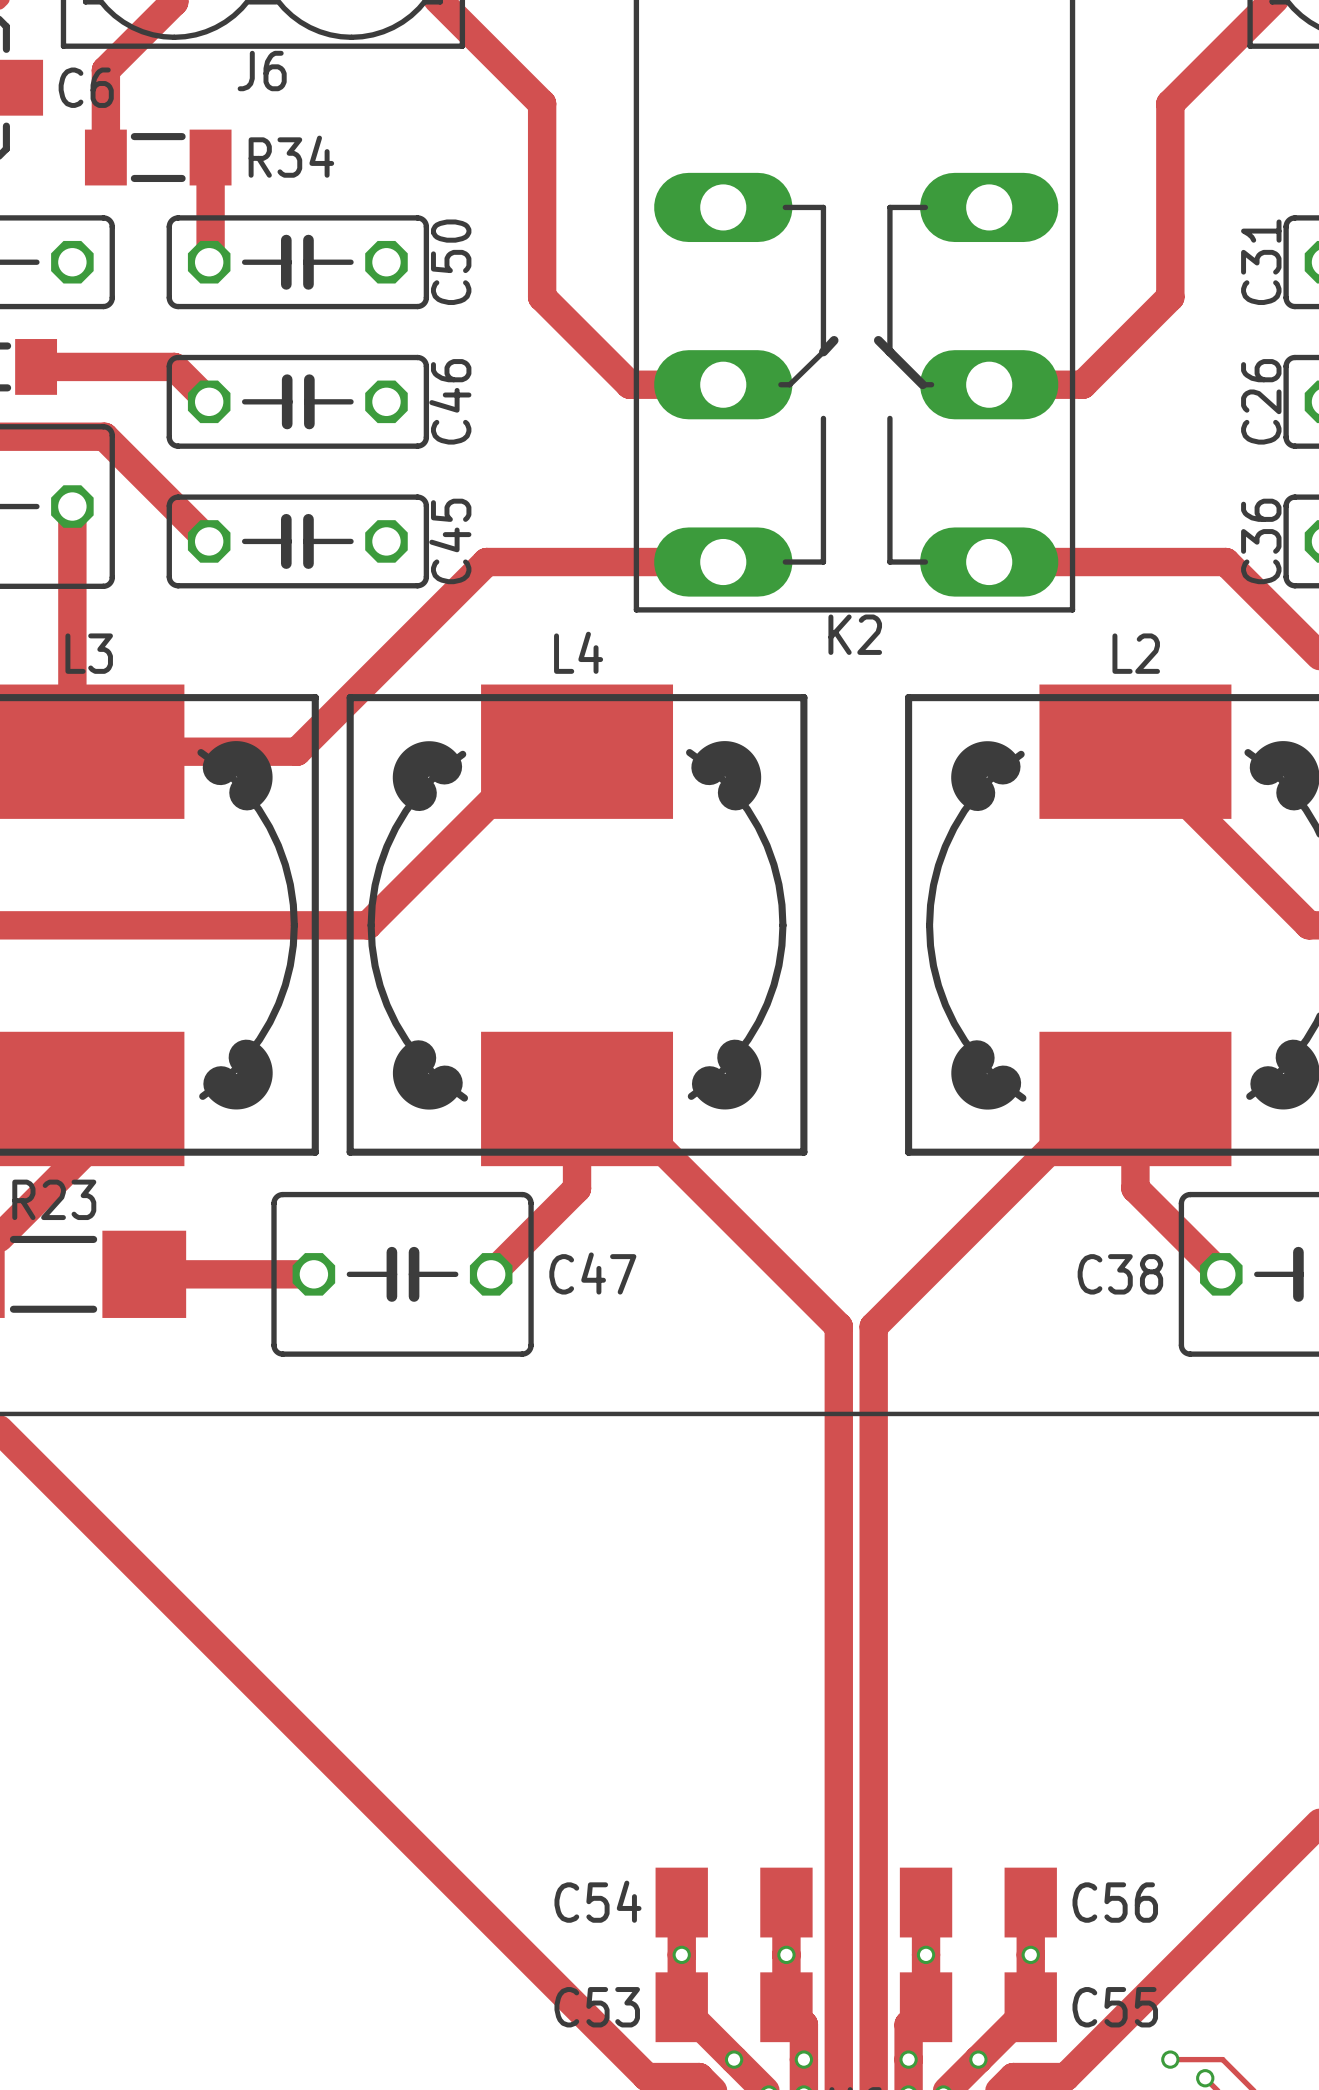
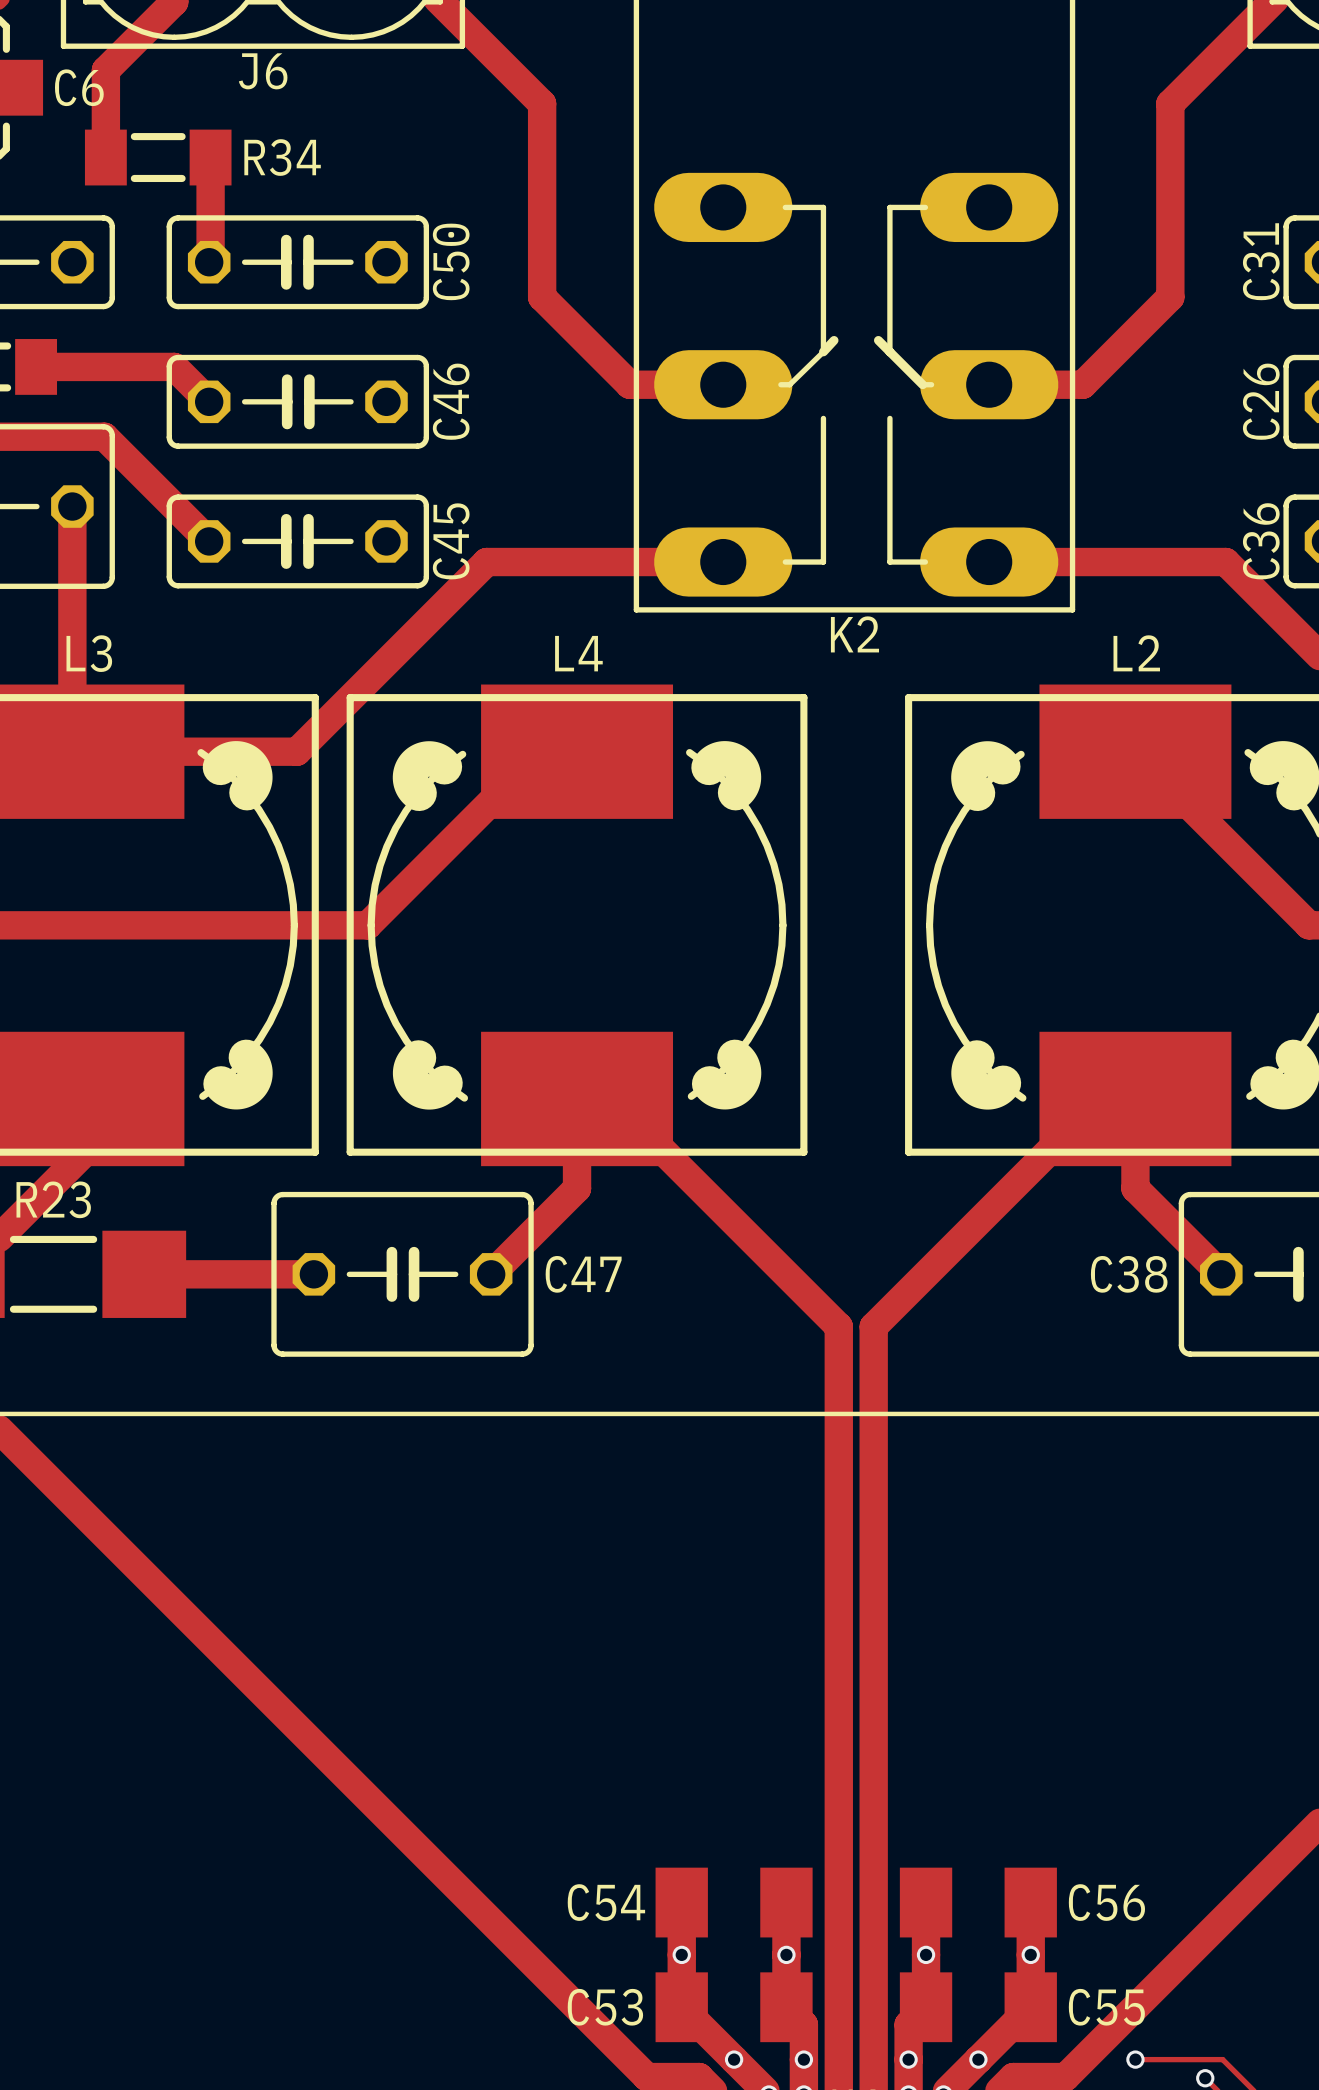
track: none -> (1135, 2059) (1170, 2059)
via: none -> (1135, 2059)
via: (1170, 2059) -> none

